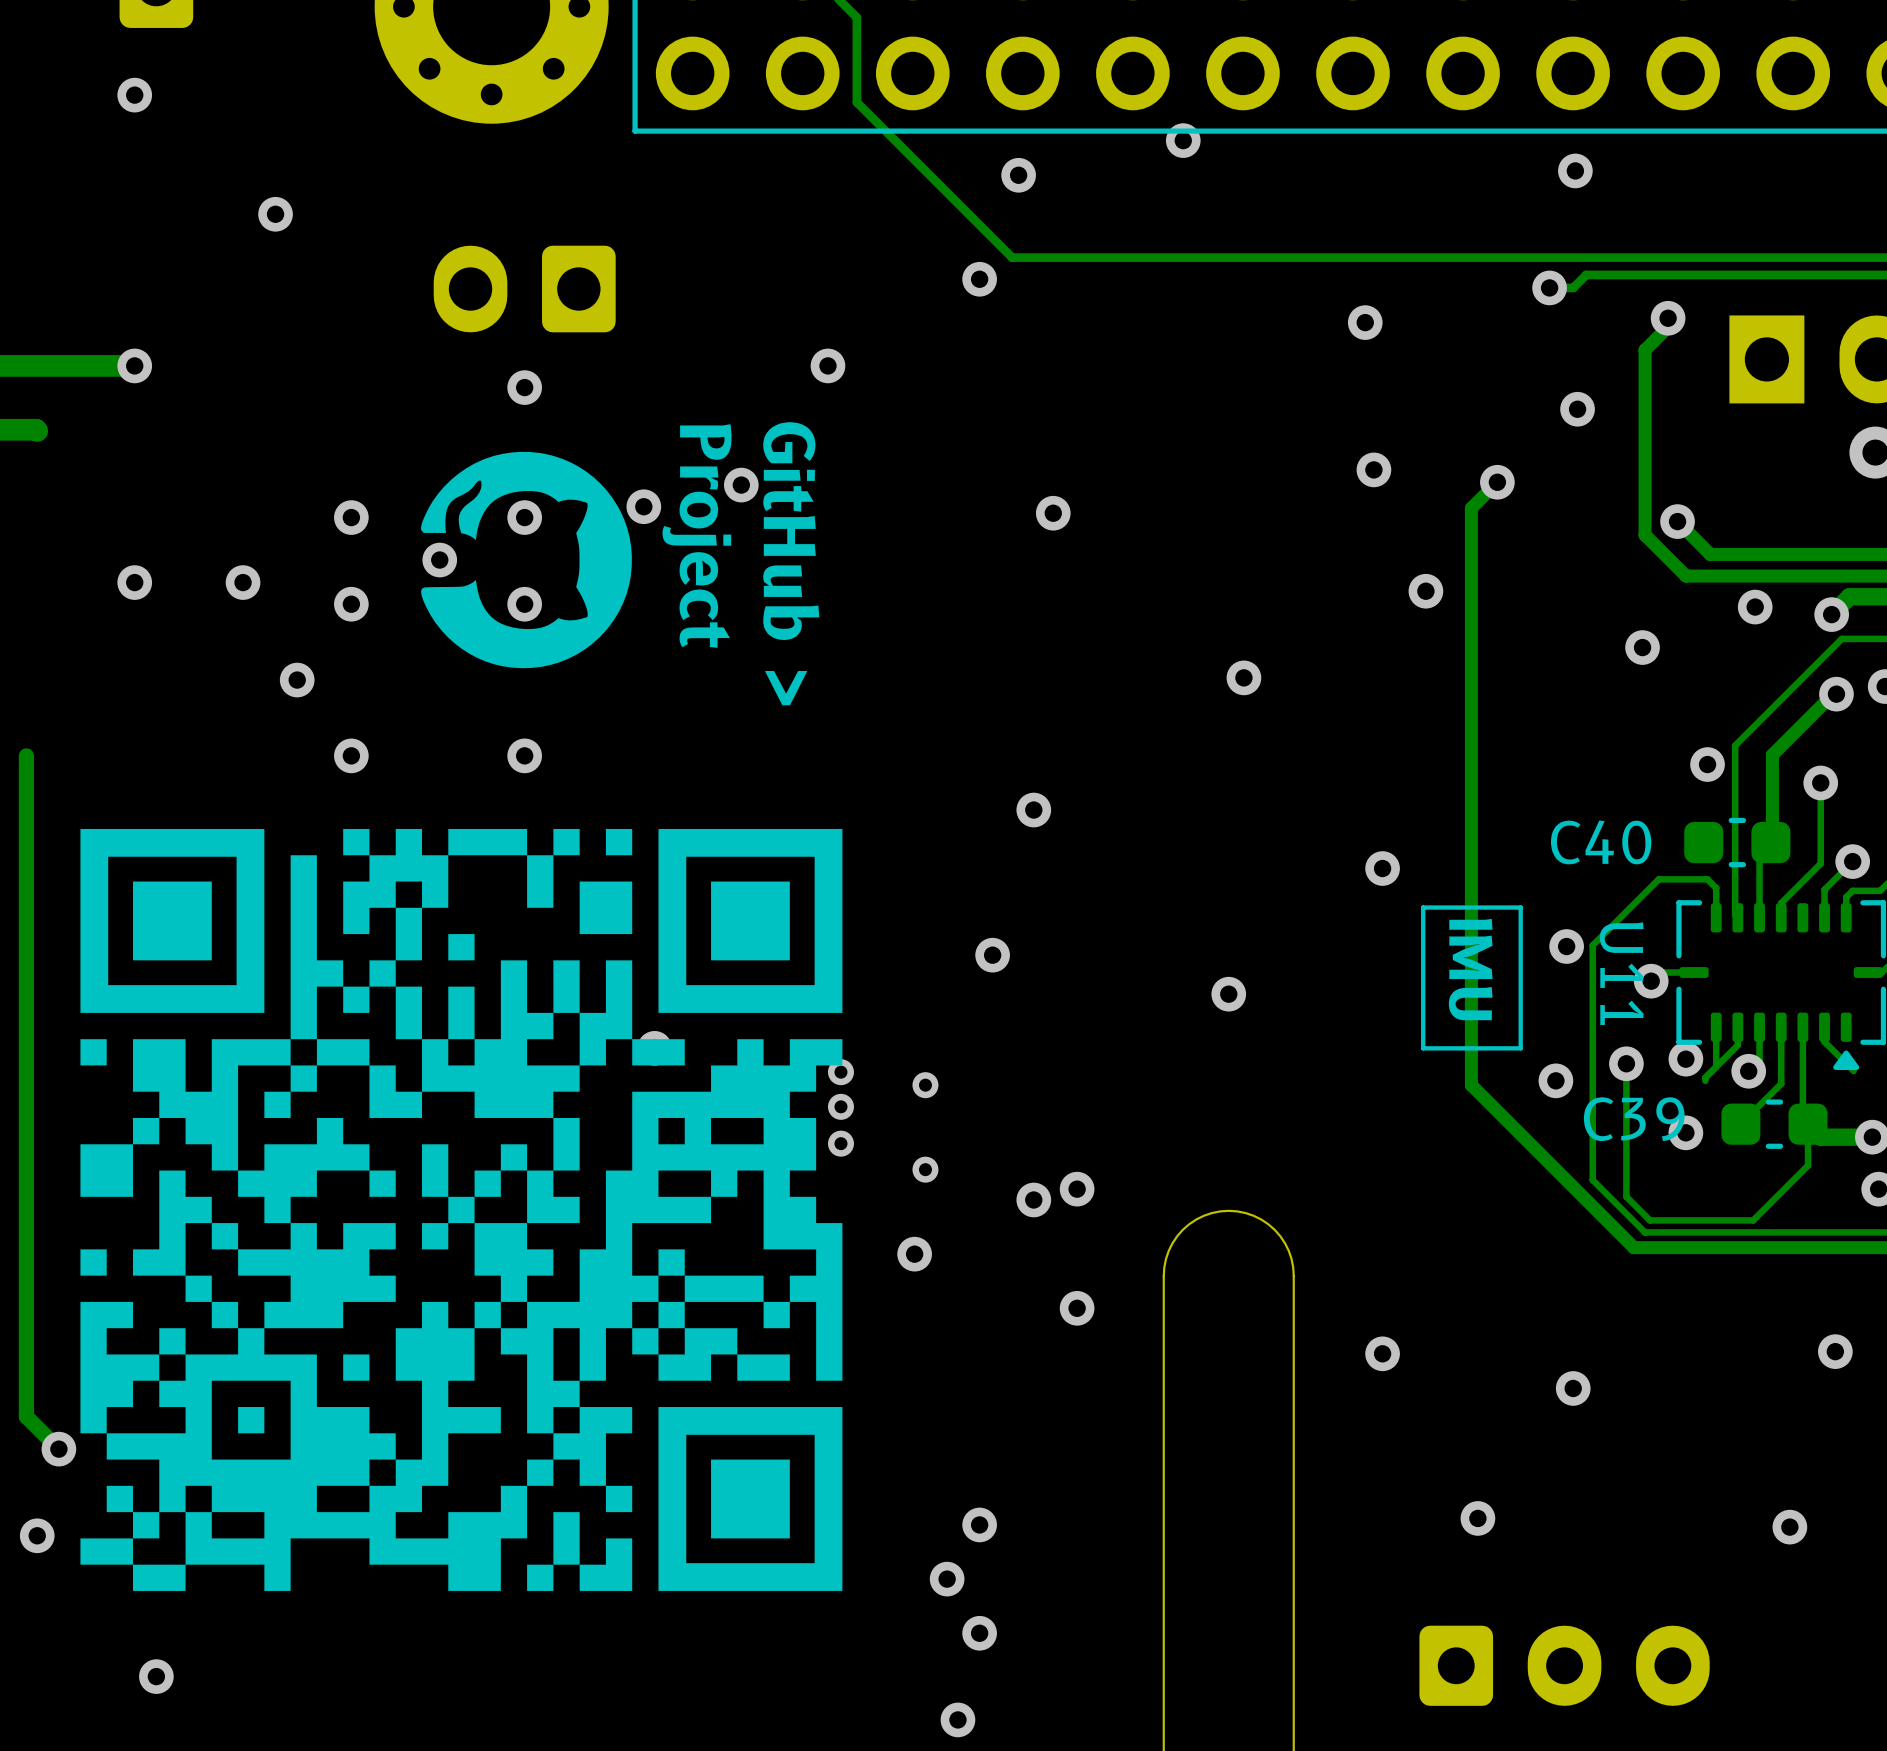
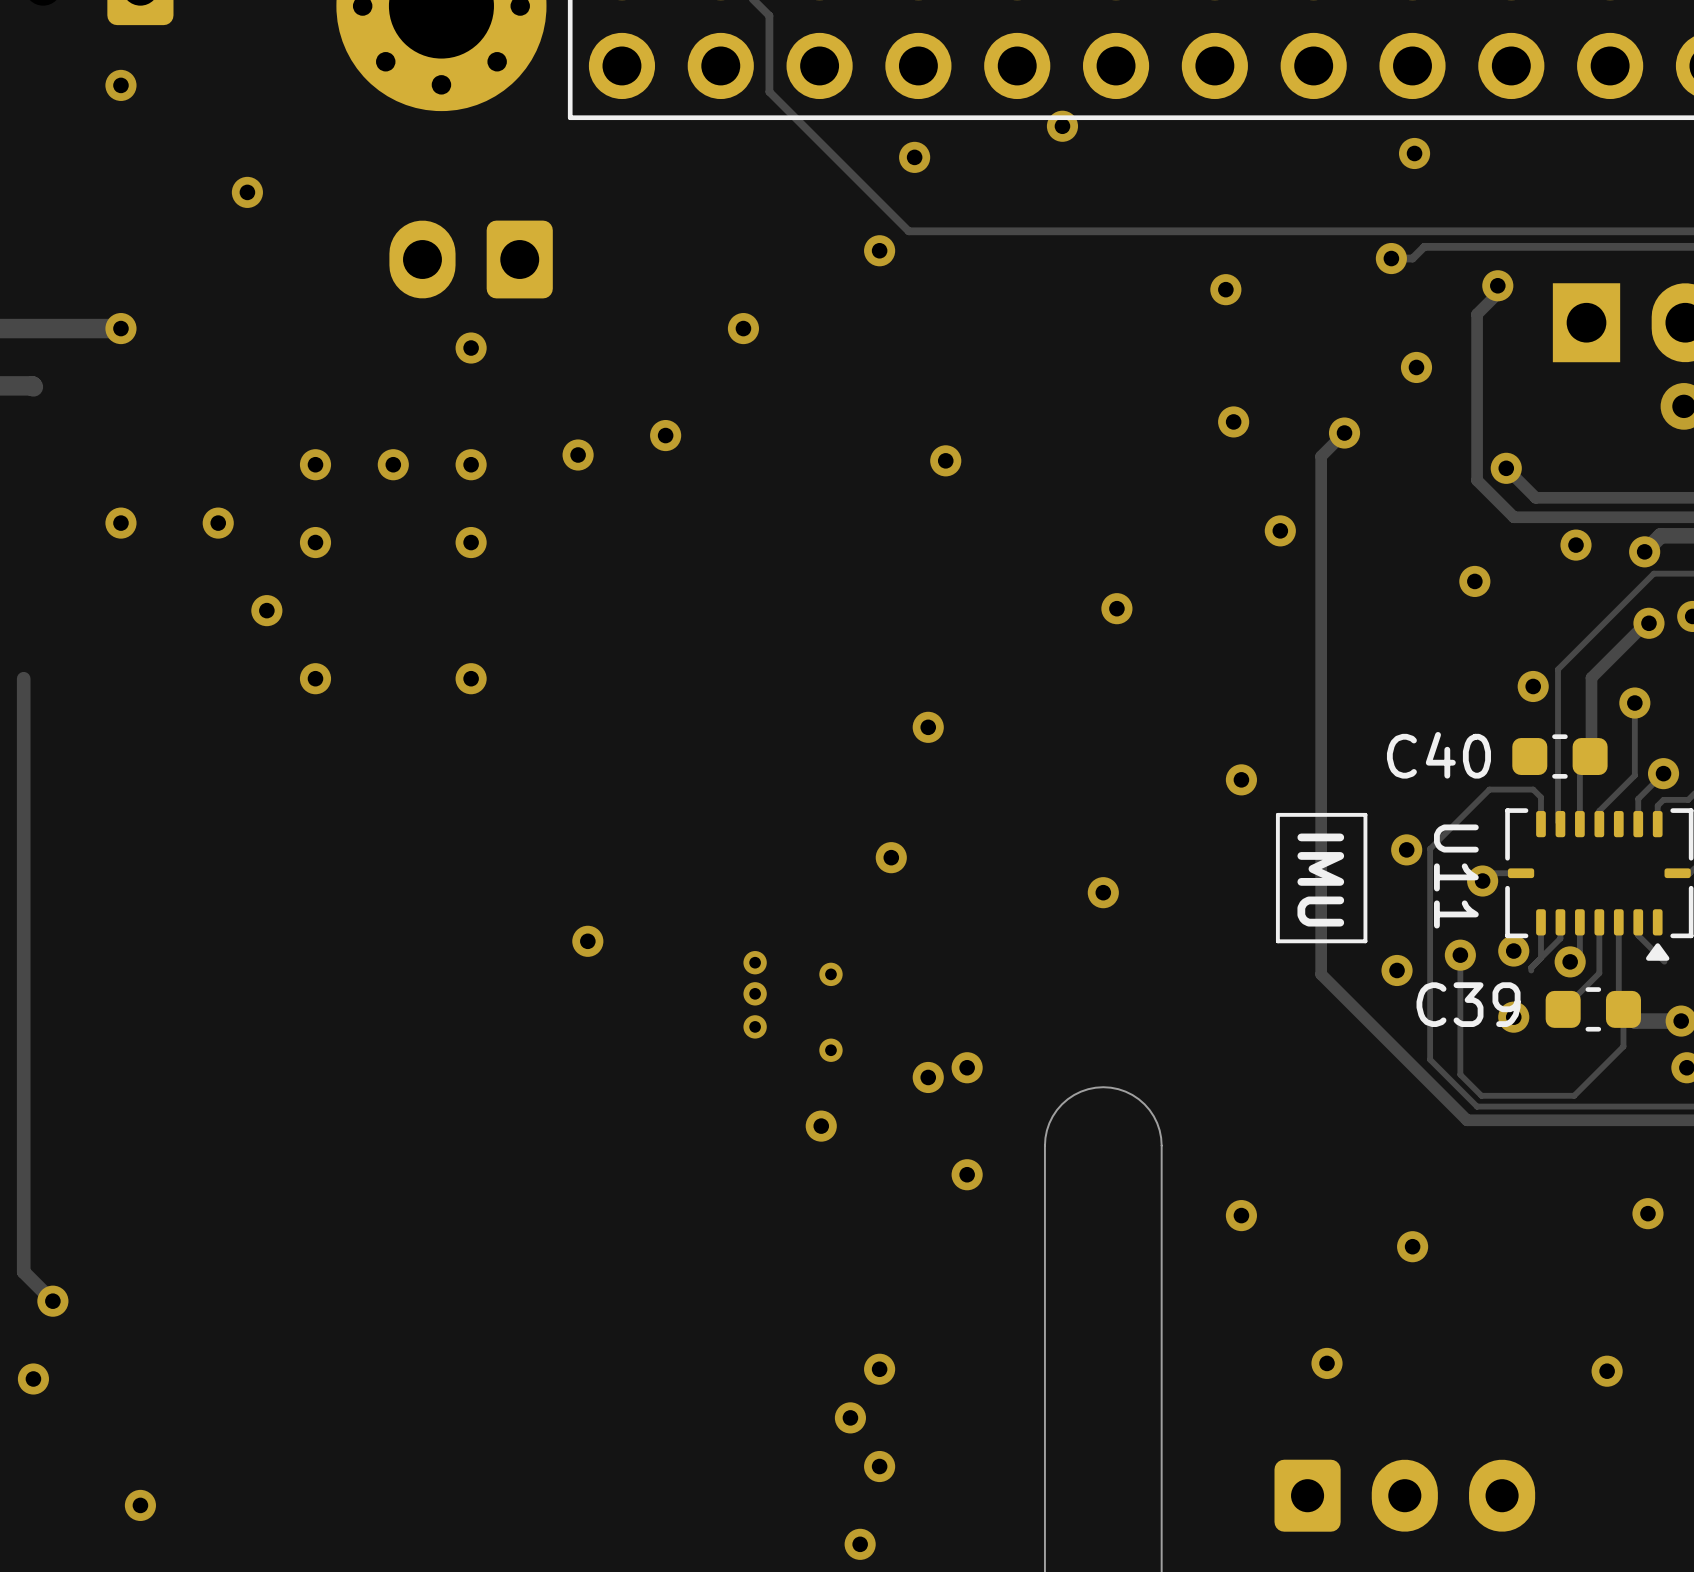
drawing: [421, 451, 632, 669] -> none
text: Project (697, 536) -> none
via position: (439, 560) -> (393, 464)
text: GitHub > (791, 563) -> none
drawing: [80, 828, 843, 1591] -> none

